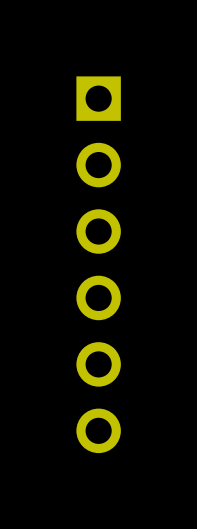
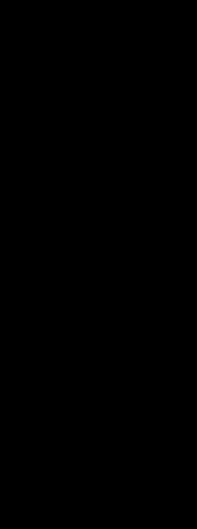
part: (98, 264) -> none

